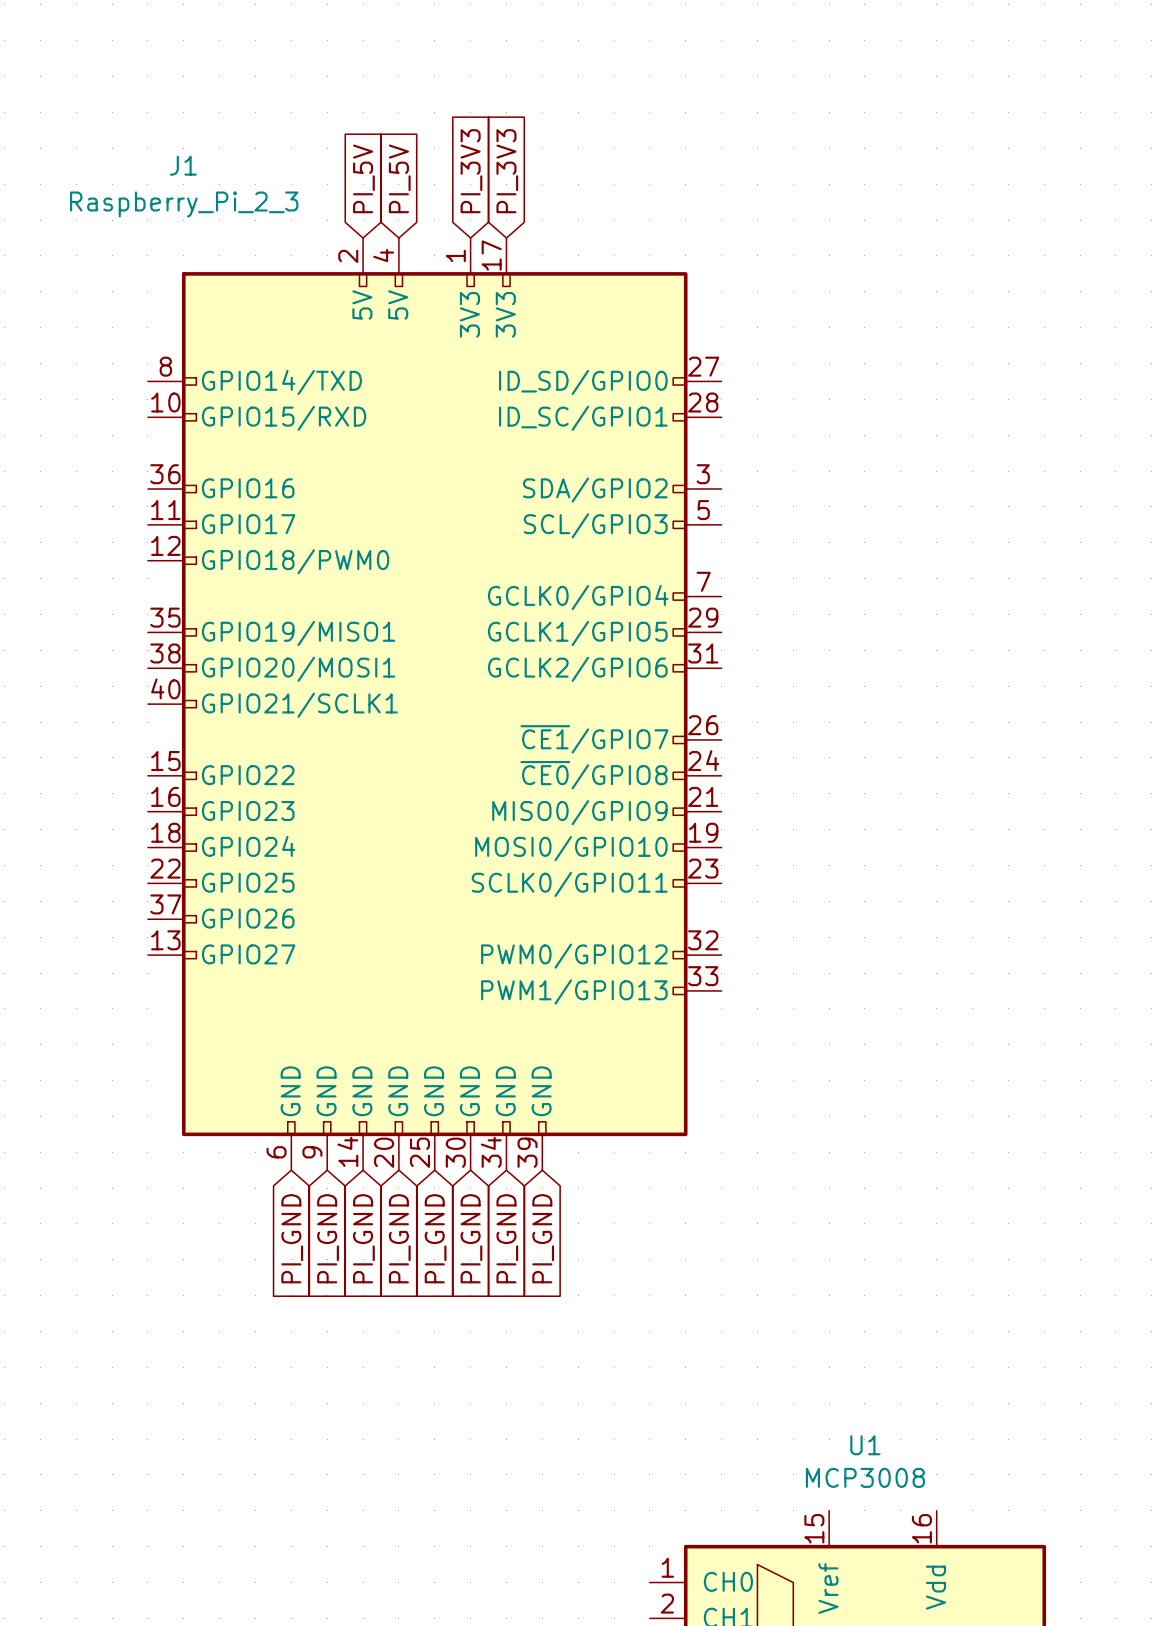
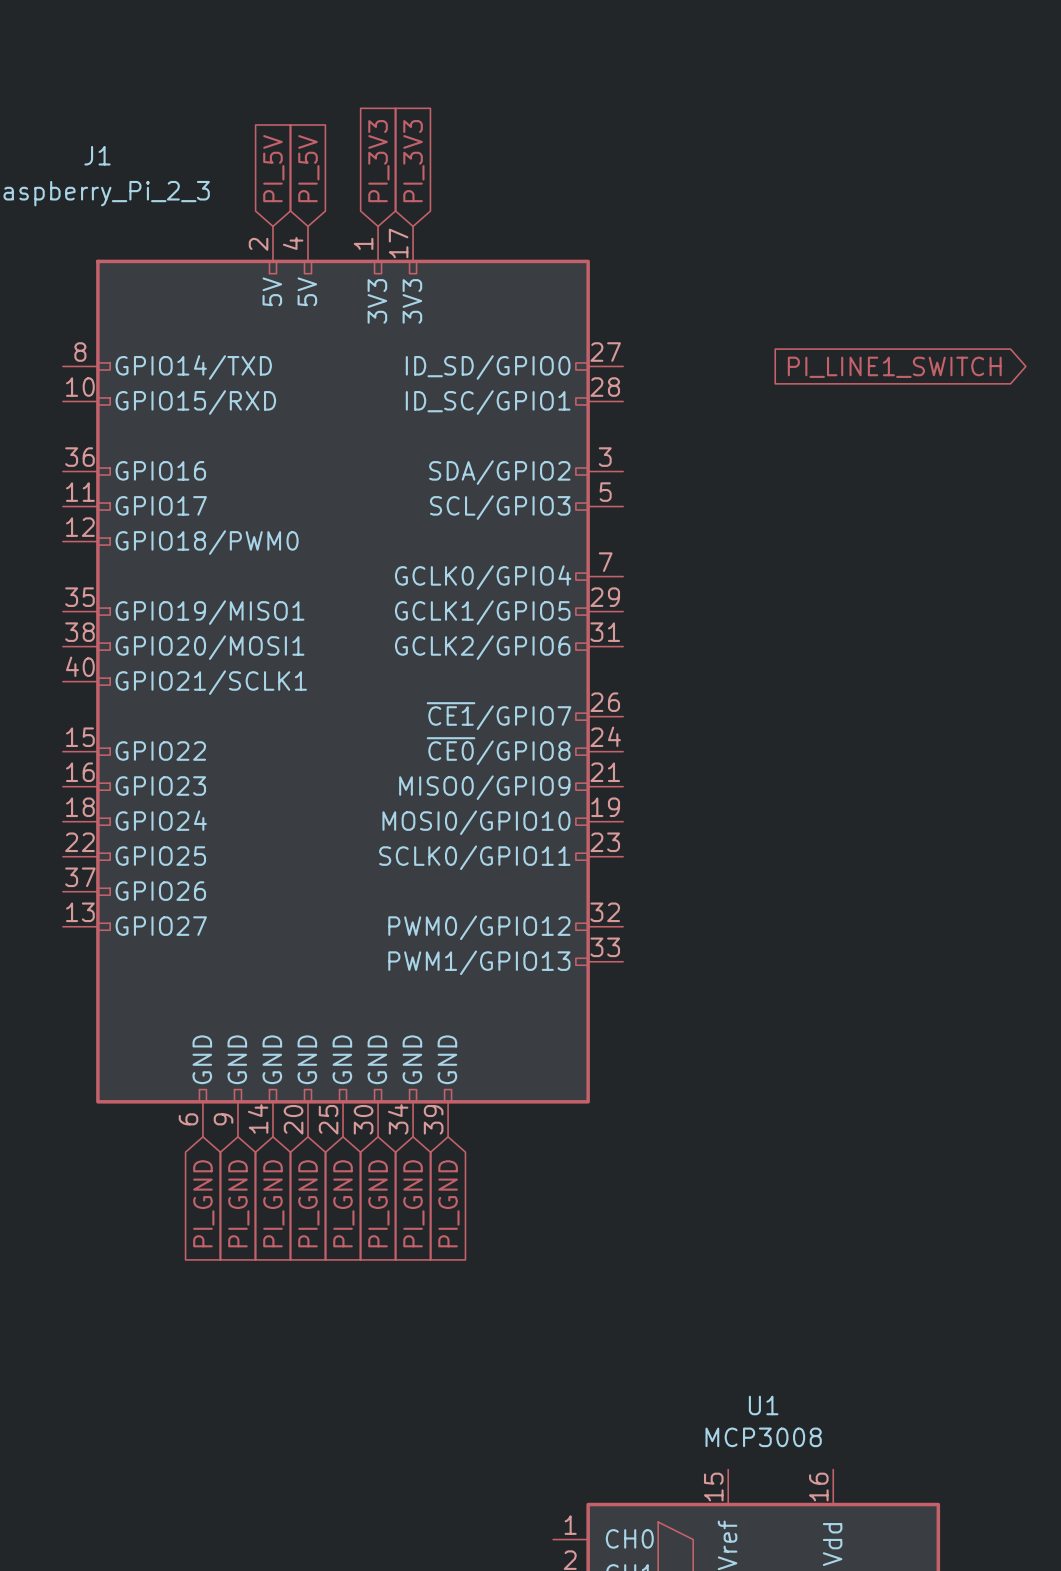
global label: none -> PI_LINE1_SWITCH (894, 367)

